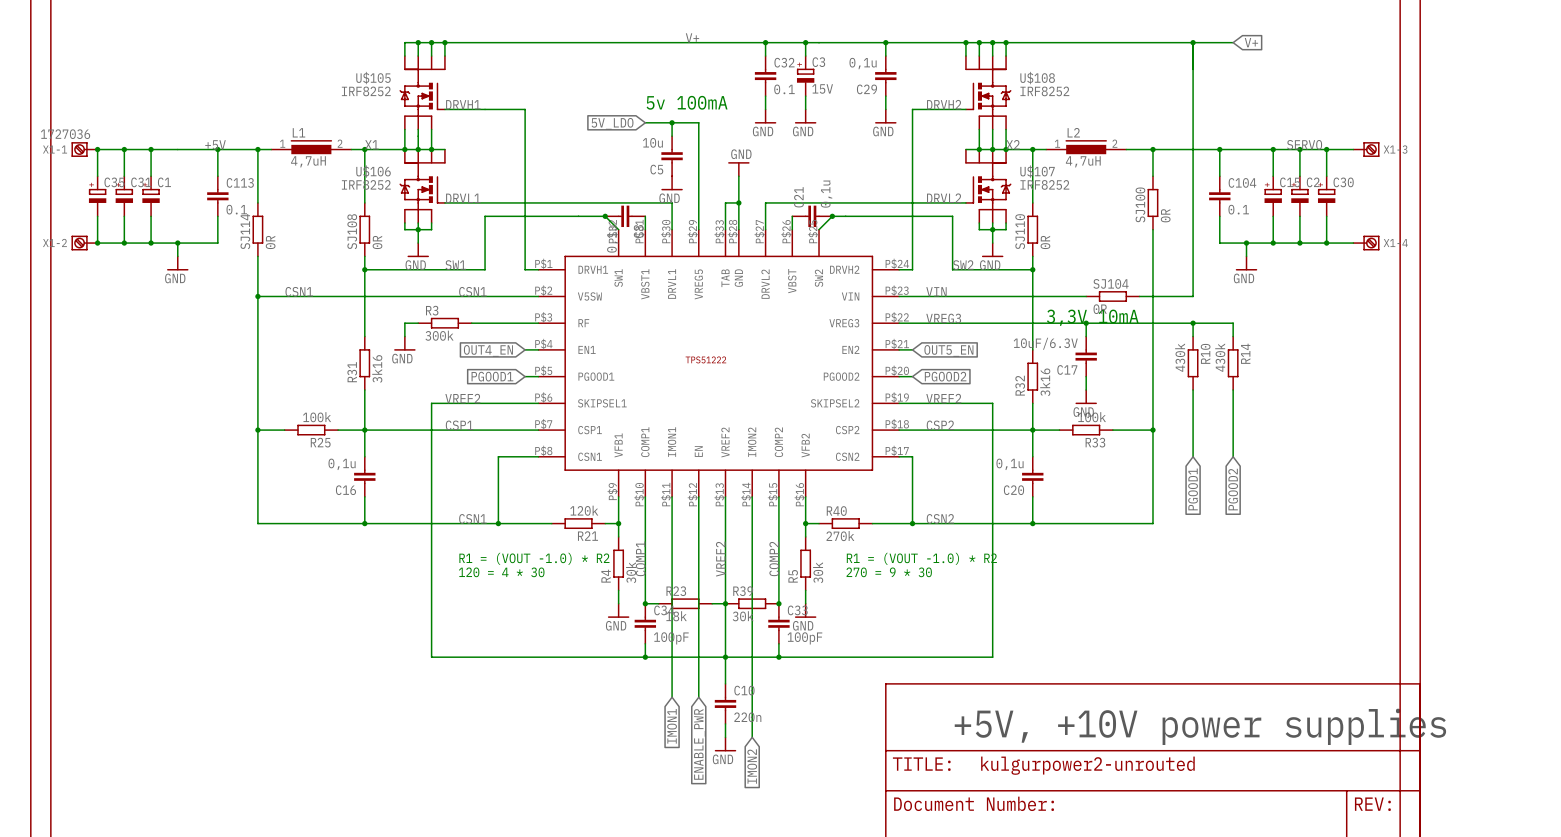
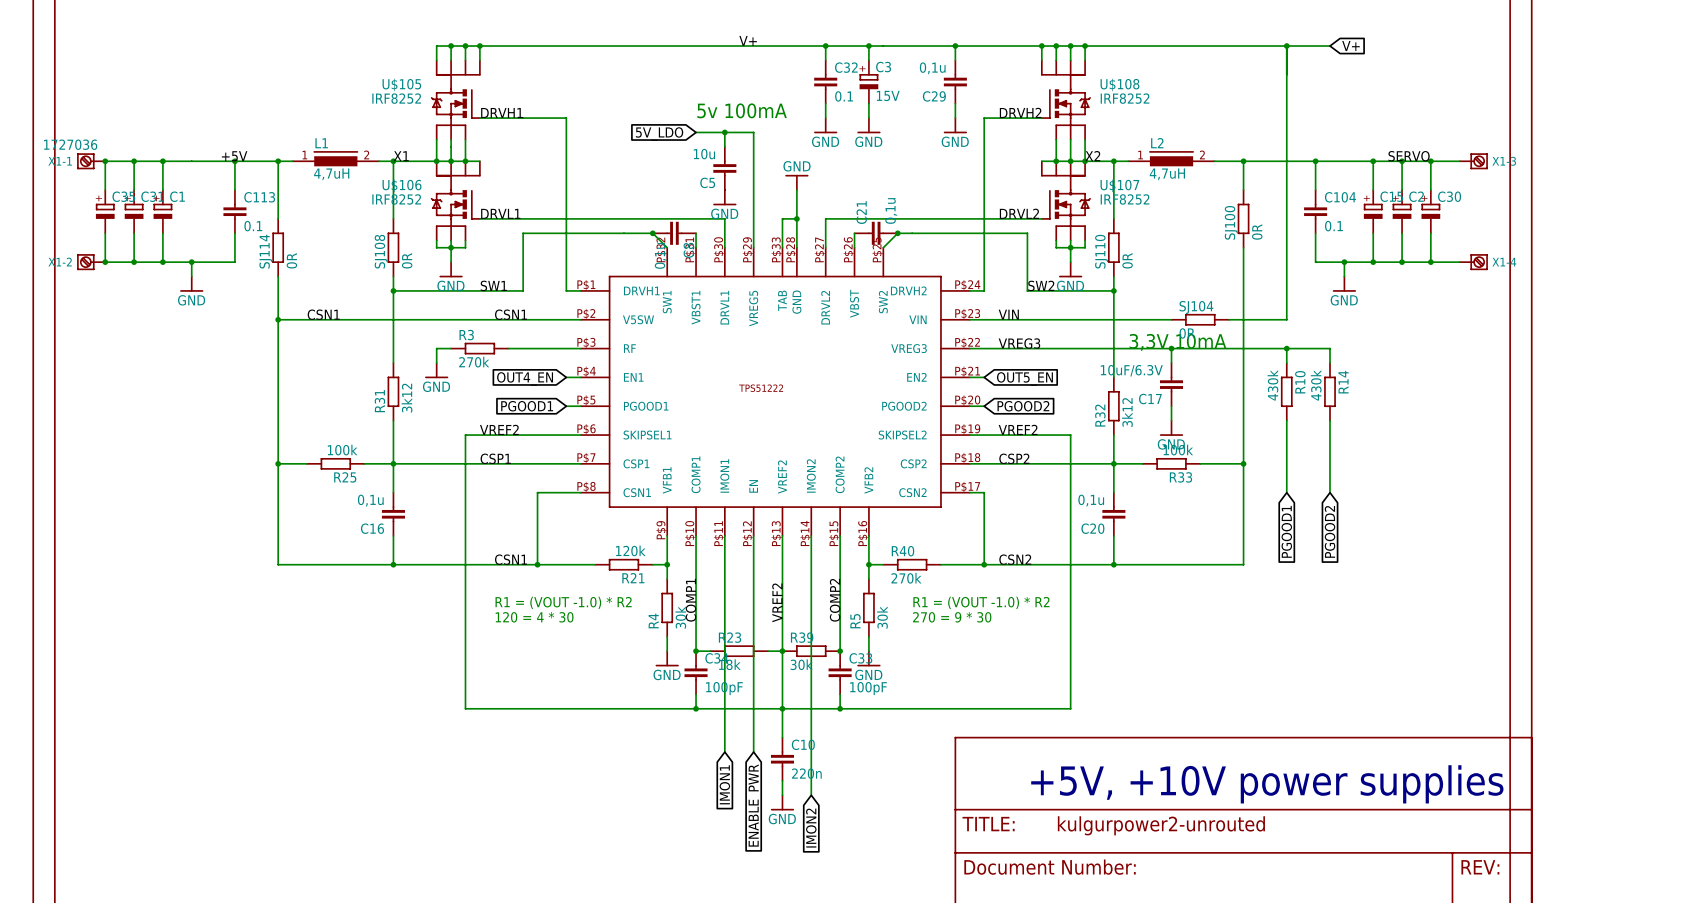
R3 value: 300k (439, 335) -> 270k (474, 362)
R31 value: 3k16 (377, 368) -> 3k12 (407, 398)
R32 value: 3k16 (1045, 382) -> 3k12 (1127, 412)

